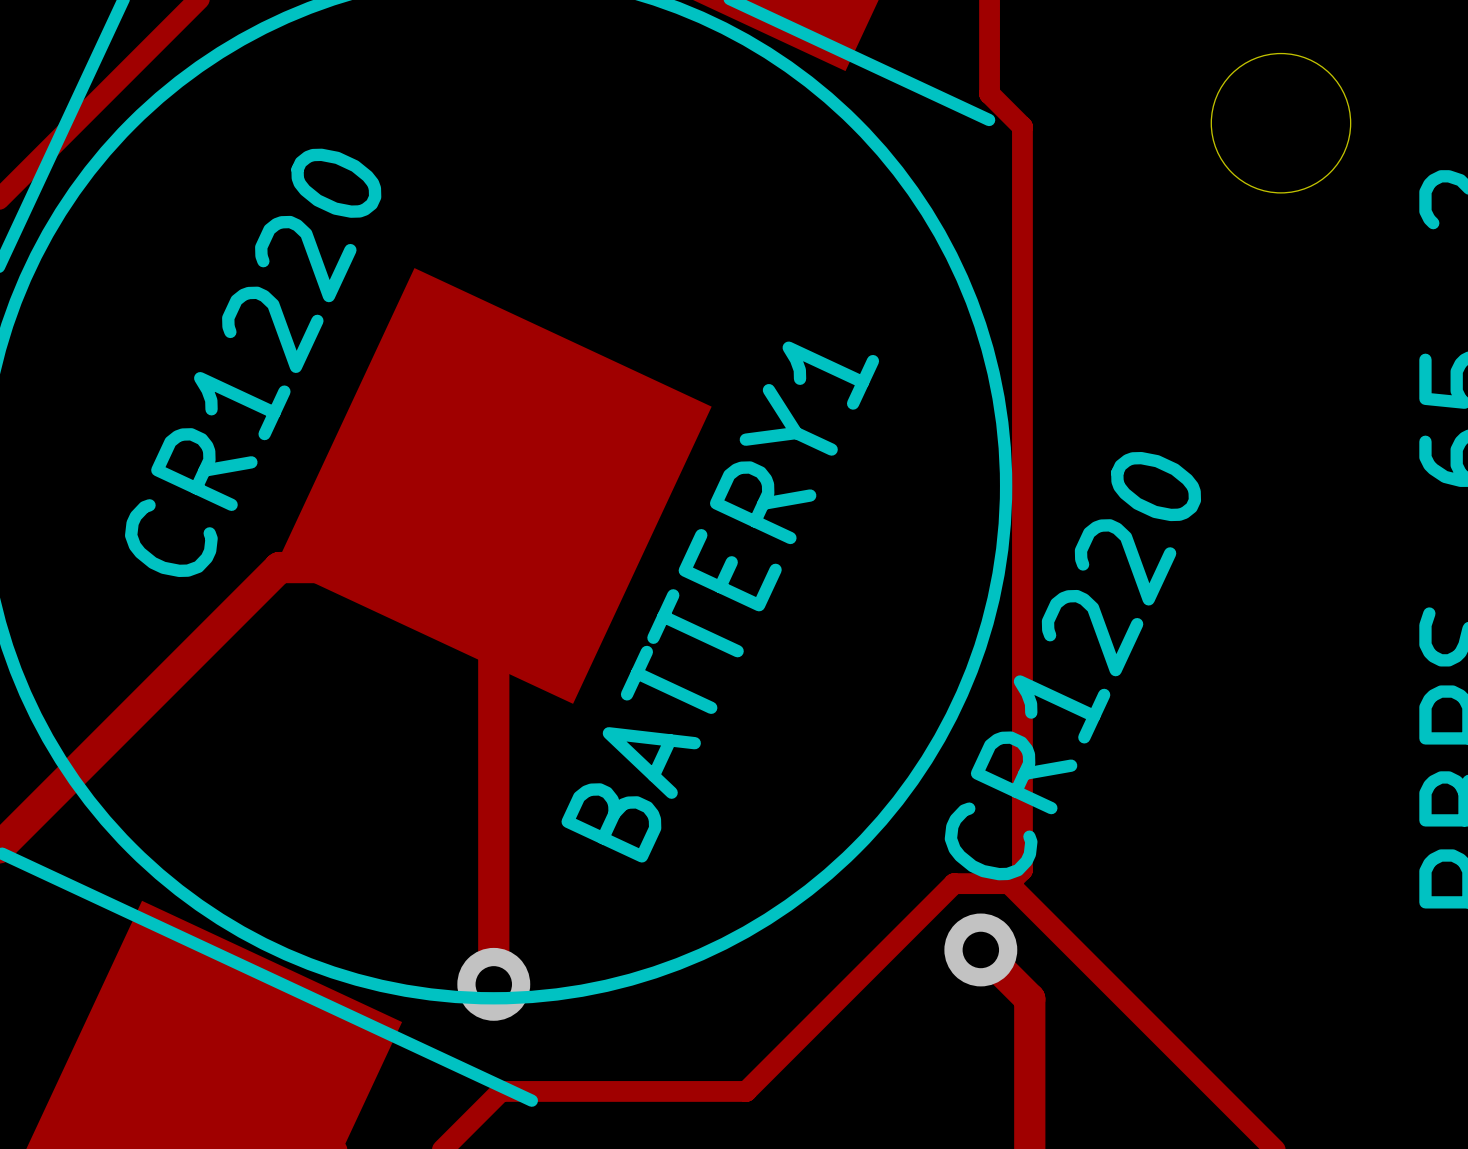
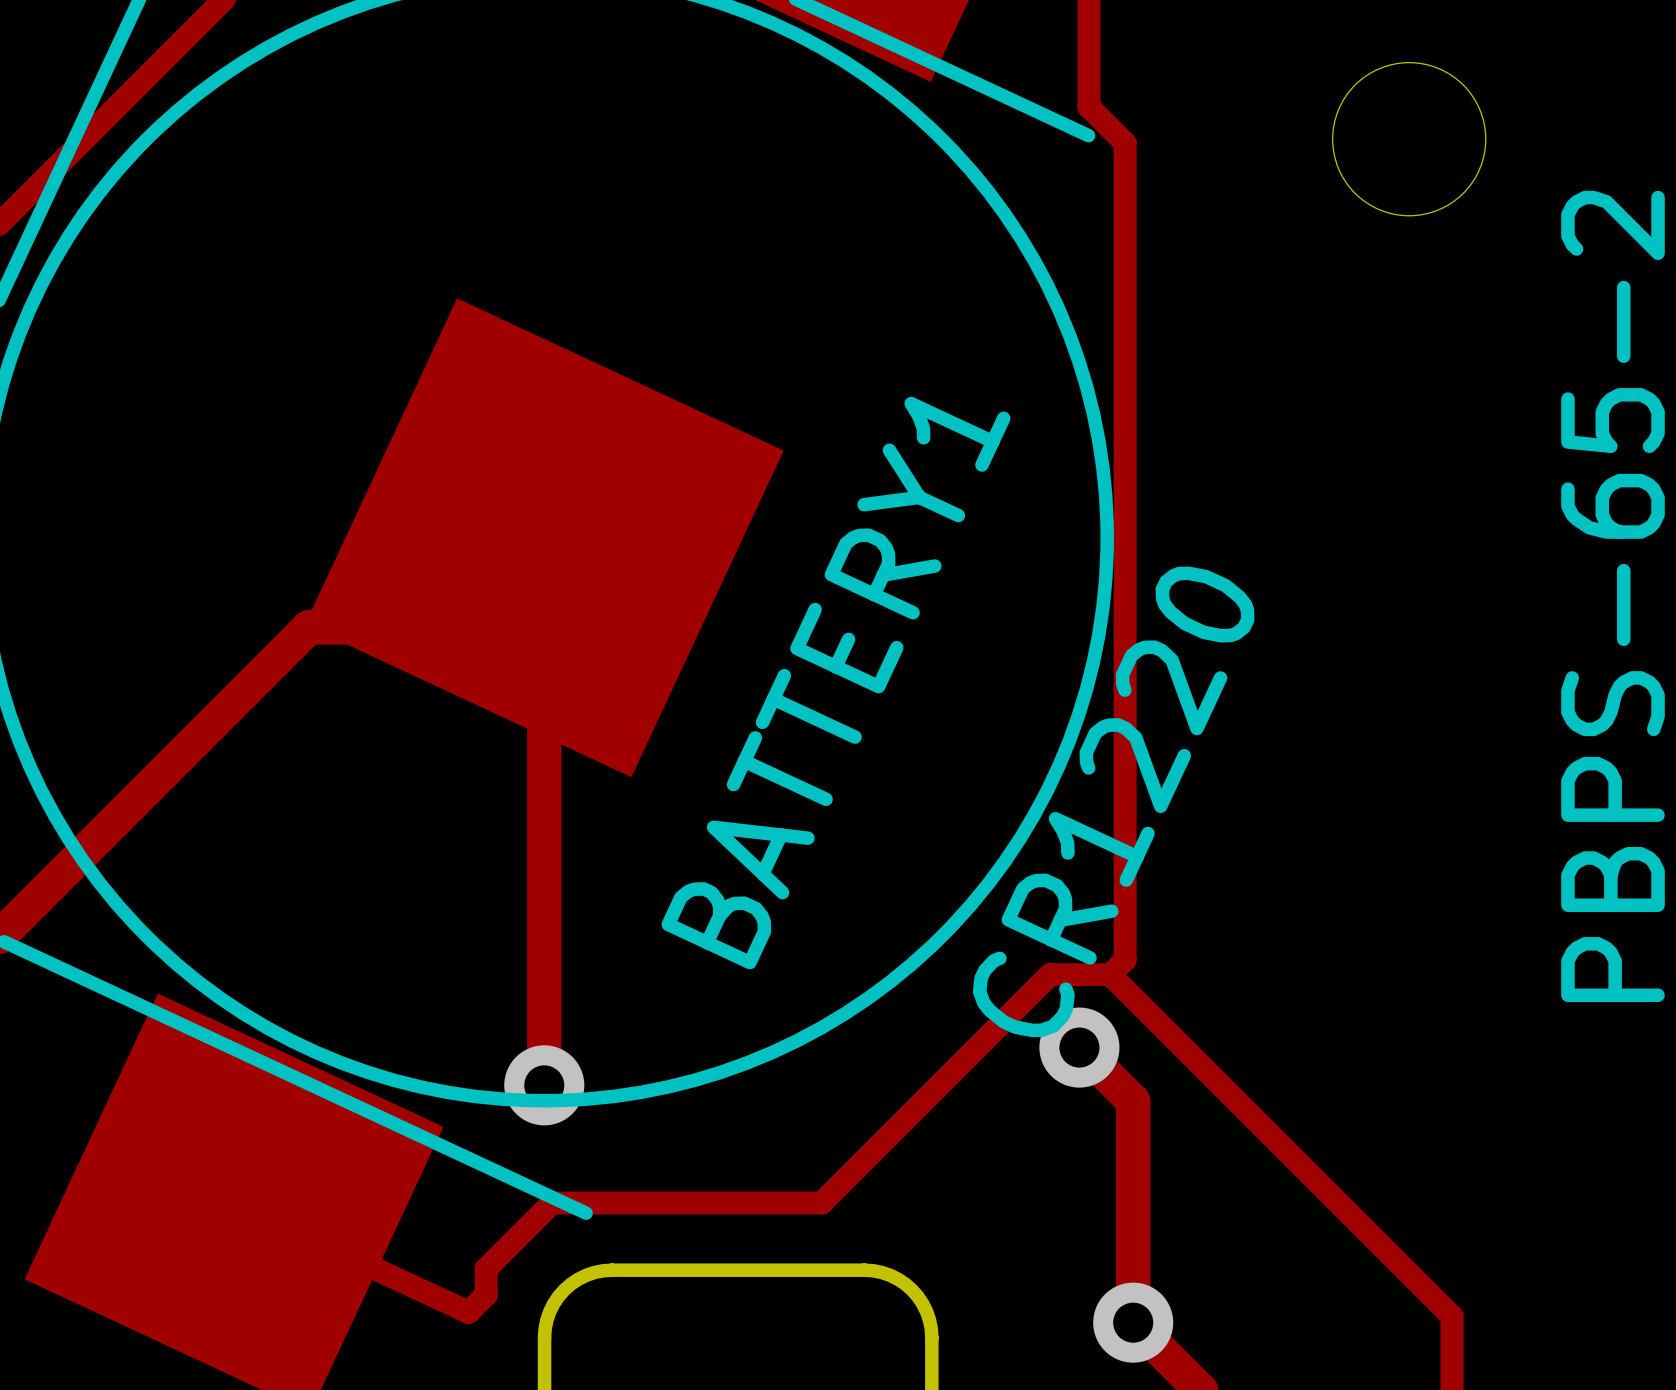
BATTERY1 value position: CR1220 (253, 362) -> CR1220 (1113, 801)
BATTERY1 name position: BATTERY1 (720, 602) -> BATTERY1 (836, 683)
text: CR1220 (1072, 666) -> none

